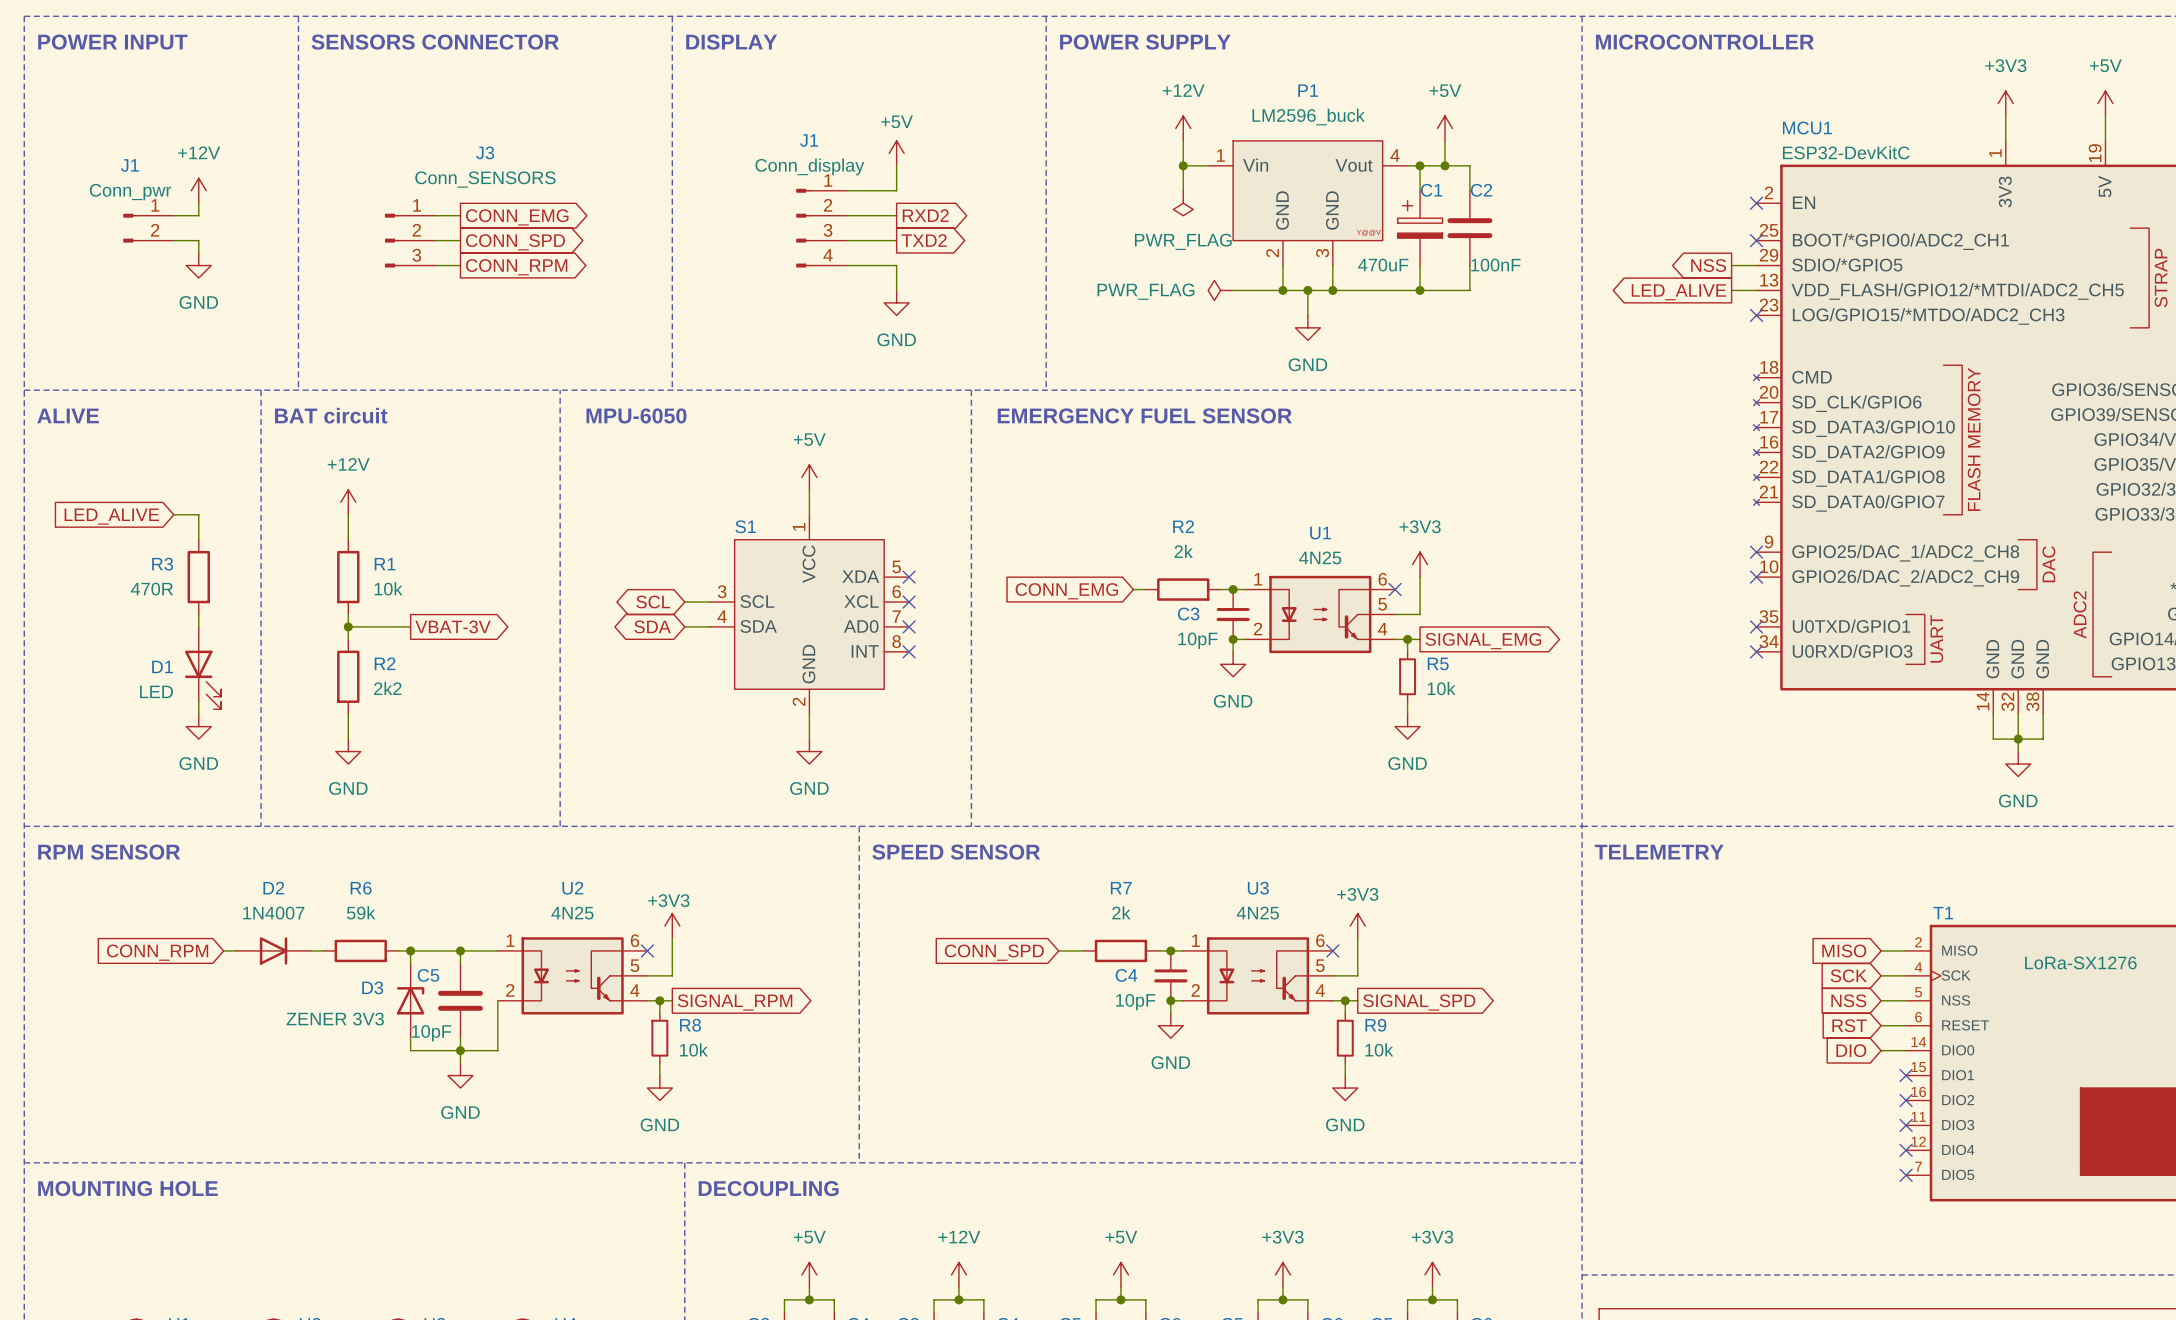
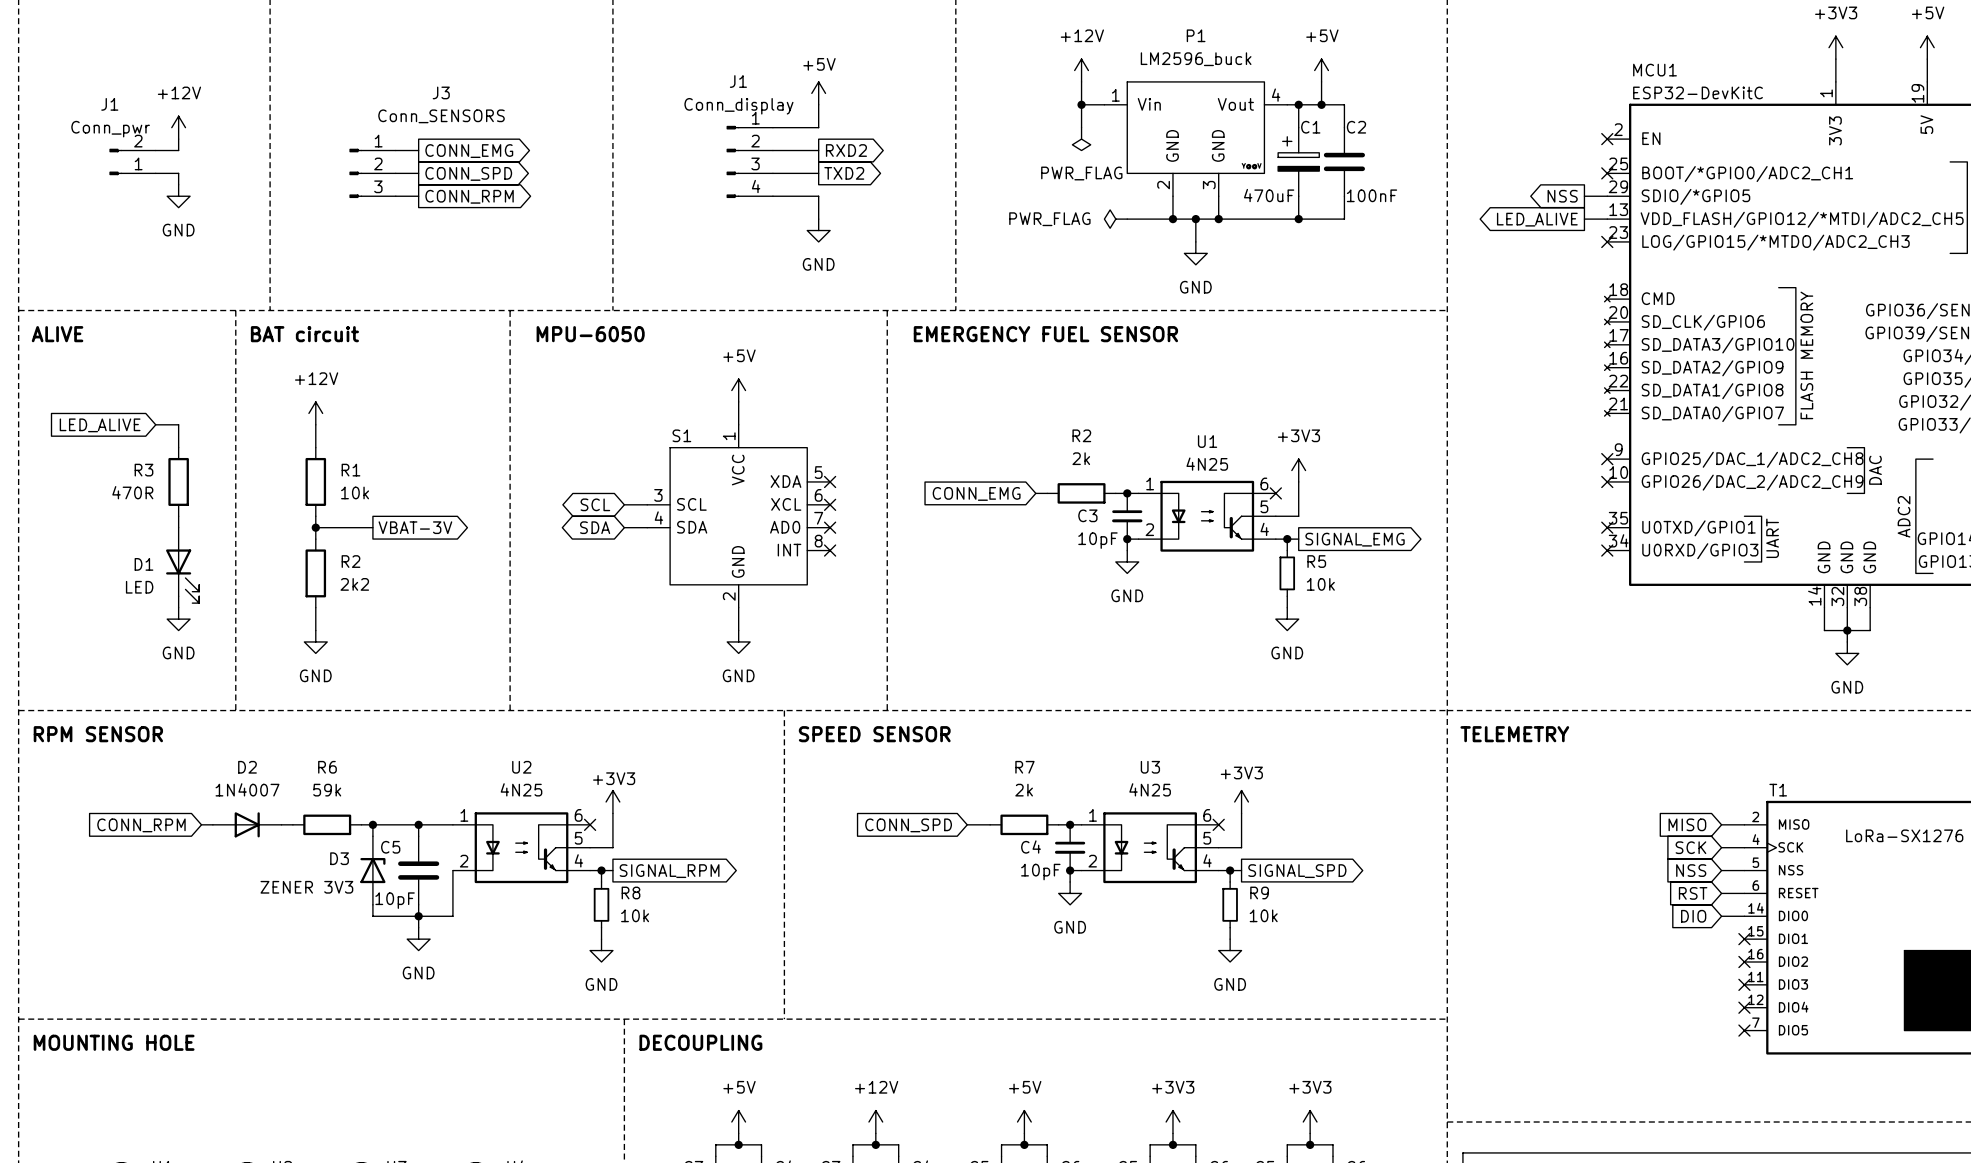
J1 flip: as is (130, 228) -> up-down (115, 161)

